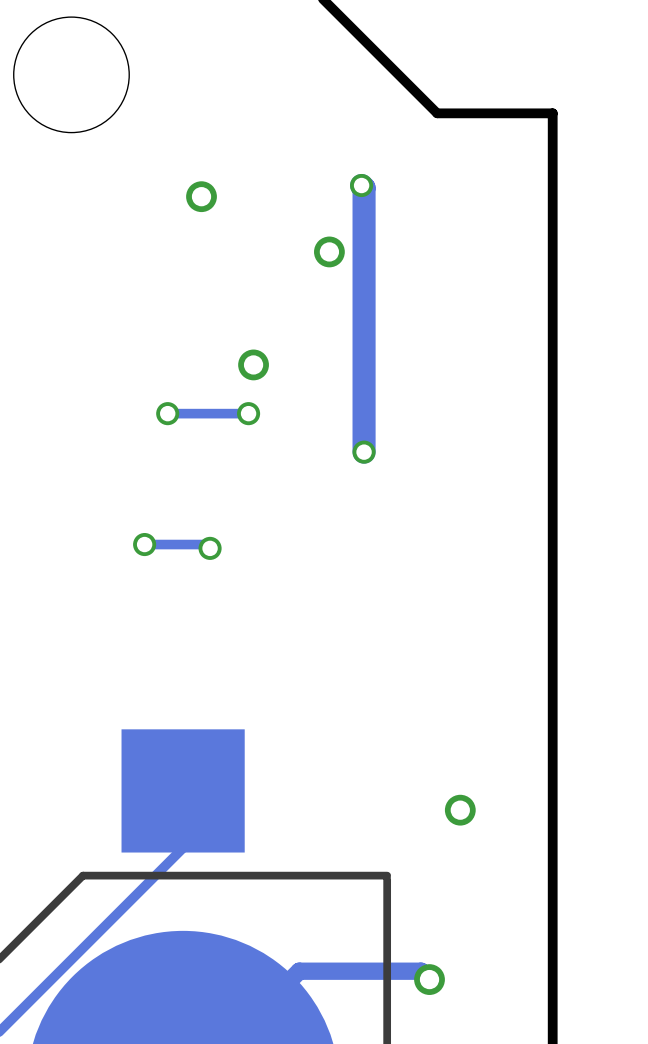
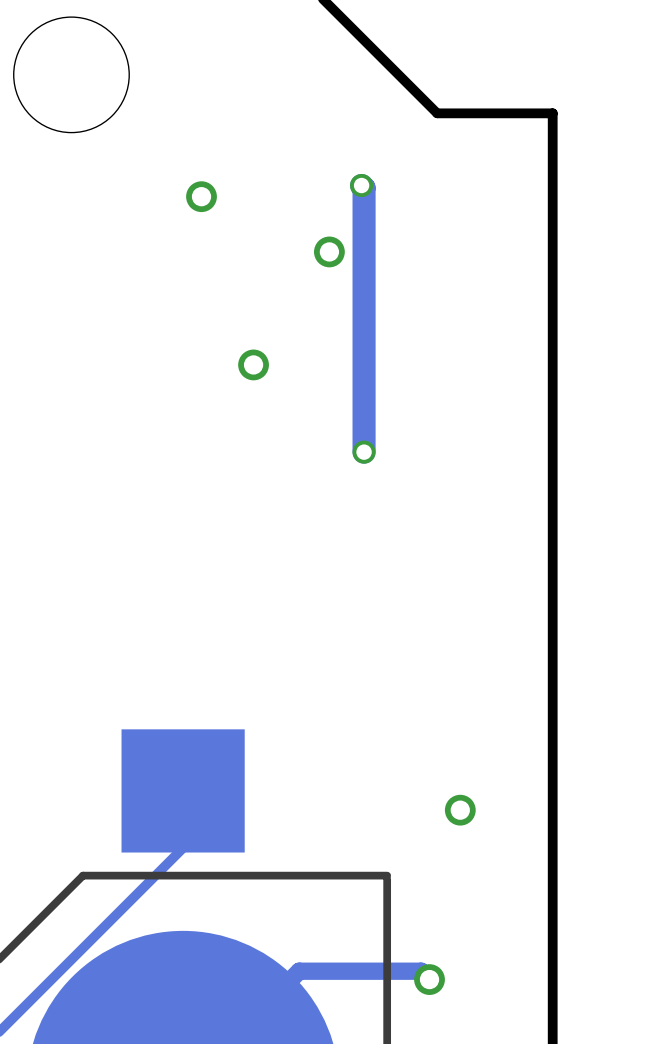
via: (167, 413) -> none
track: (248, 413) (167, 413) -> none
via: (248, 413) -> none
track: (144, 544) (206, 544) (210, 548) -> none
via: (144, 544) -> none
via: (210, 548) -> none

